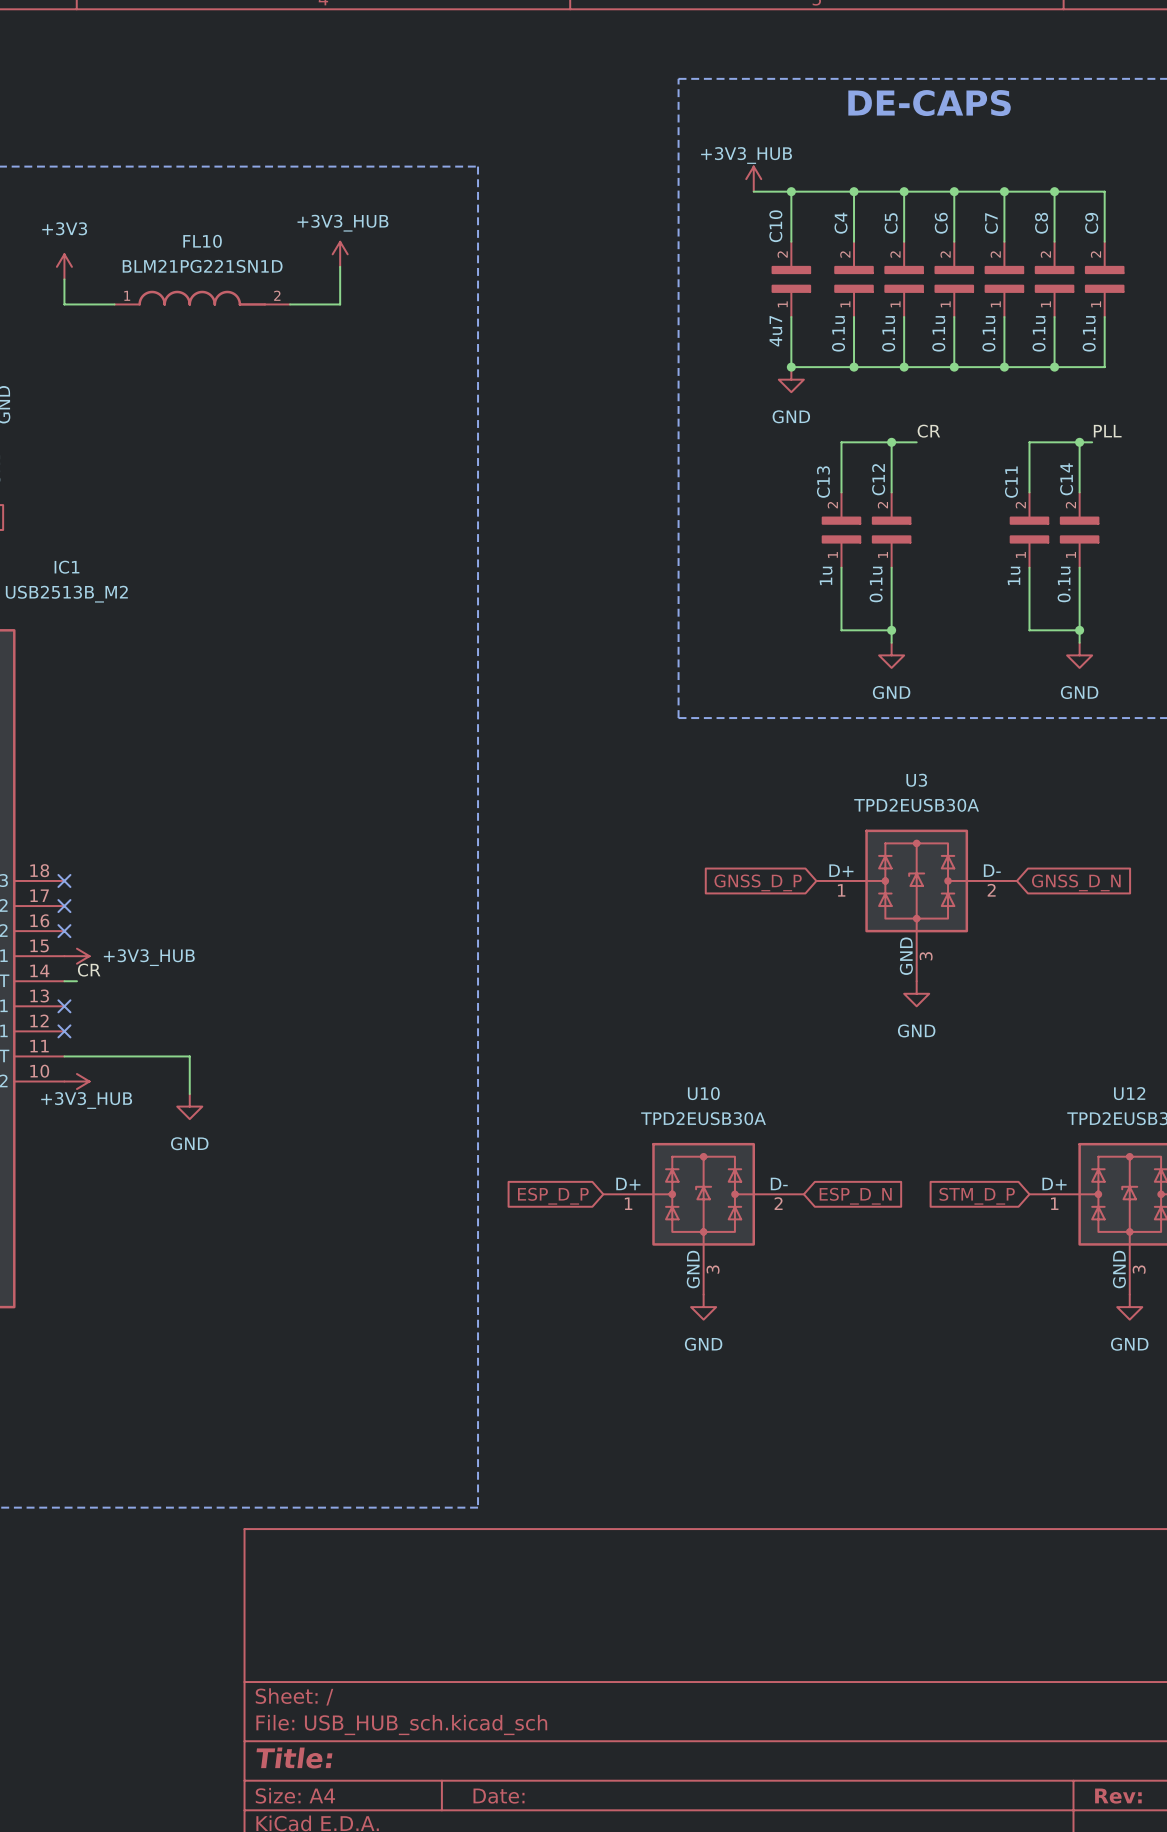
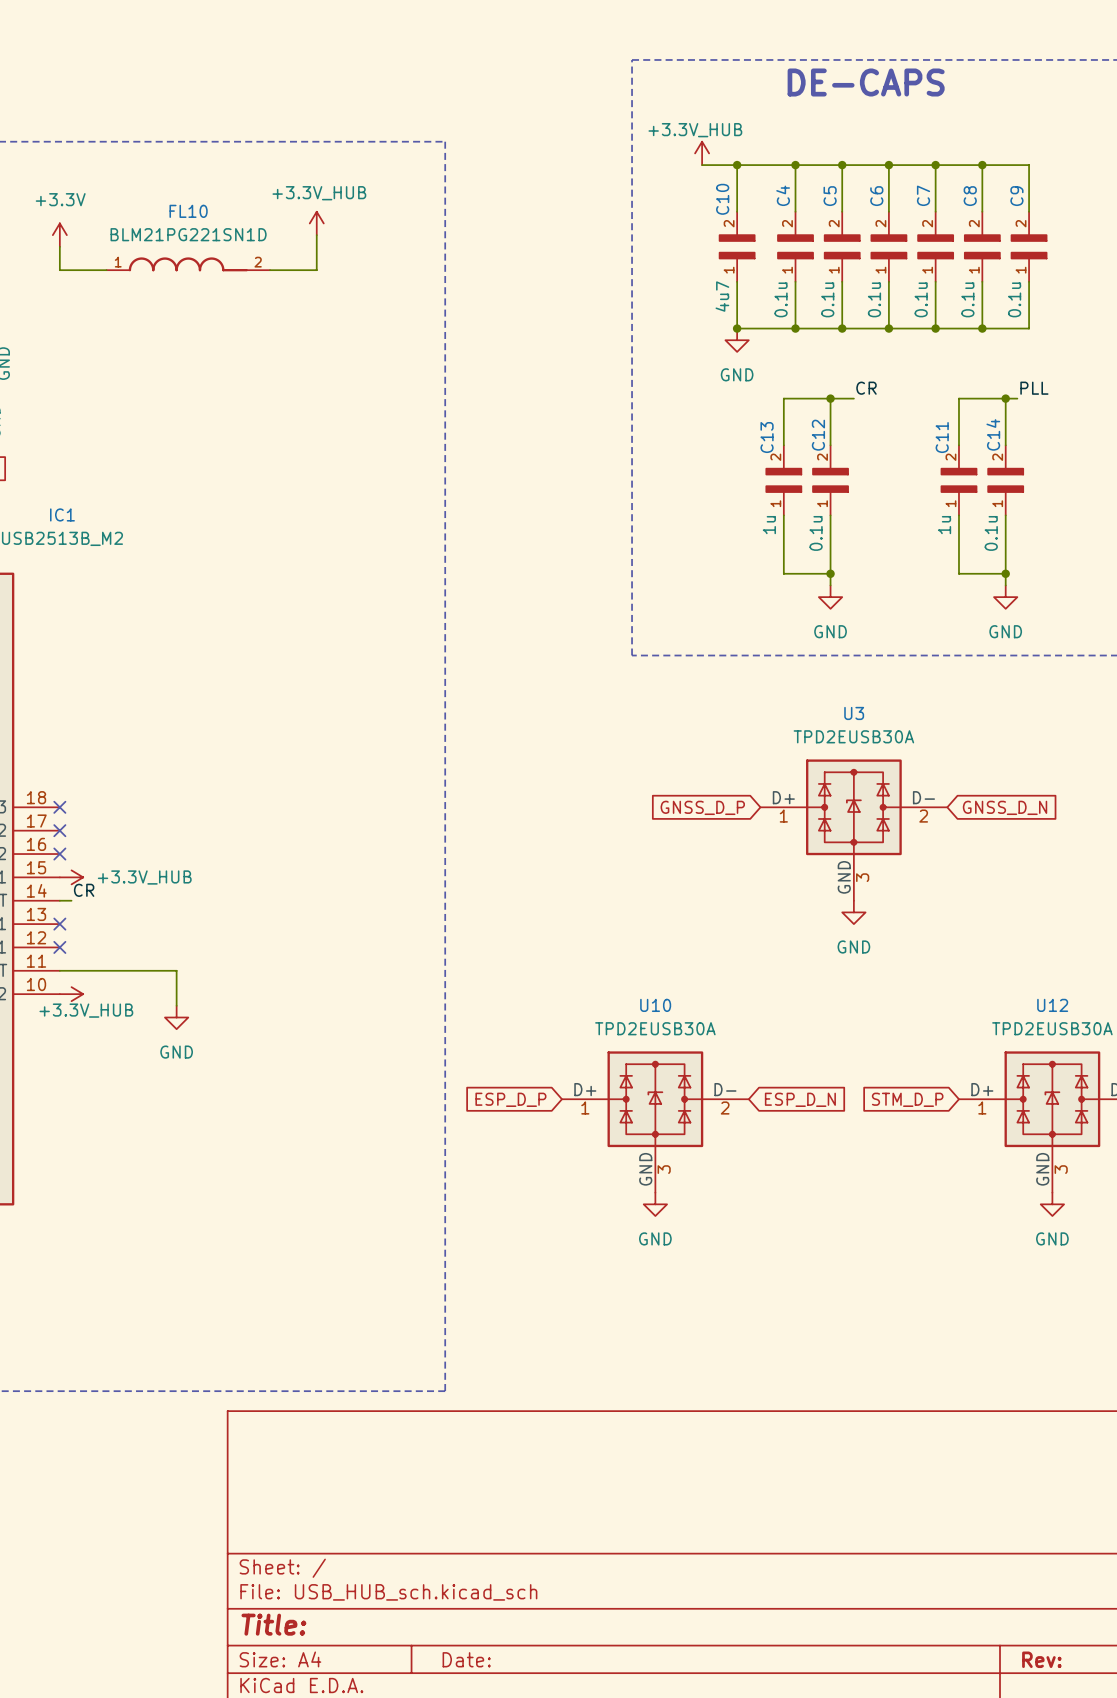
power symbol: +3V3_HUB (753, 179) -> +3.3V_HUB (702, 153)
power symbol: +3V3_HUB (340, 254) -> +3.3V_HUB (316, 223)
power symbol: +3V3 (64, 266) -> +3.3V (59, 235)
power symbol: +3V3_HUB (76, 956) -> +3.3V_HUB (71, 877)
power symbol: +3V3_HUB (76, 1081) -> +3.3V_HUB (71, 994)

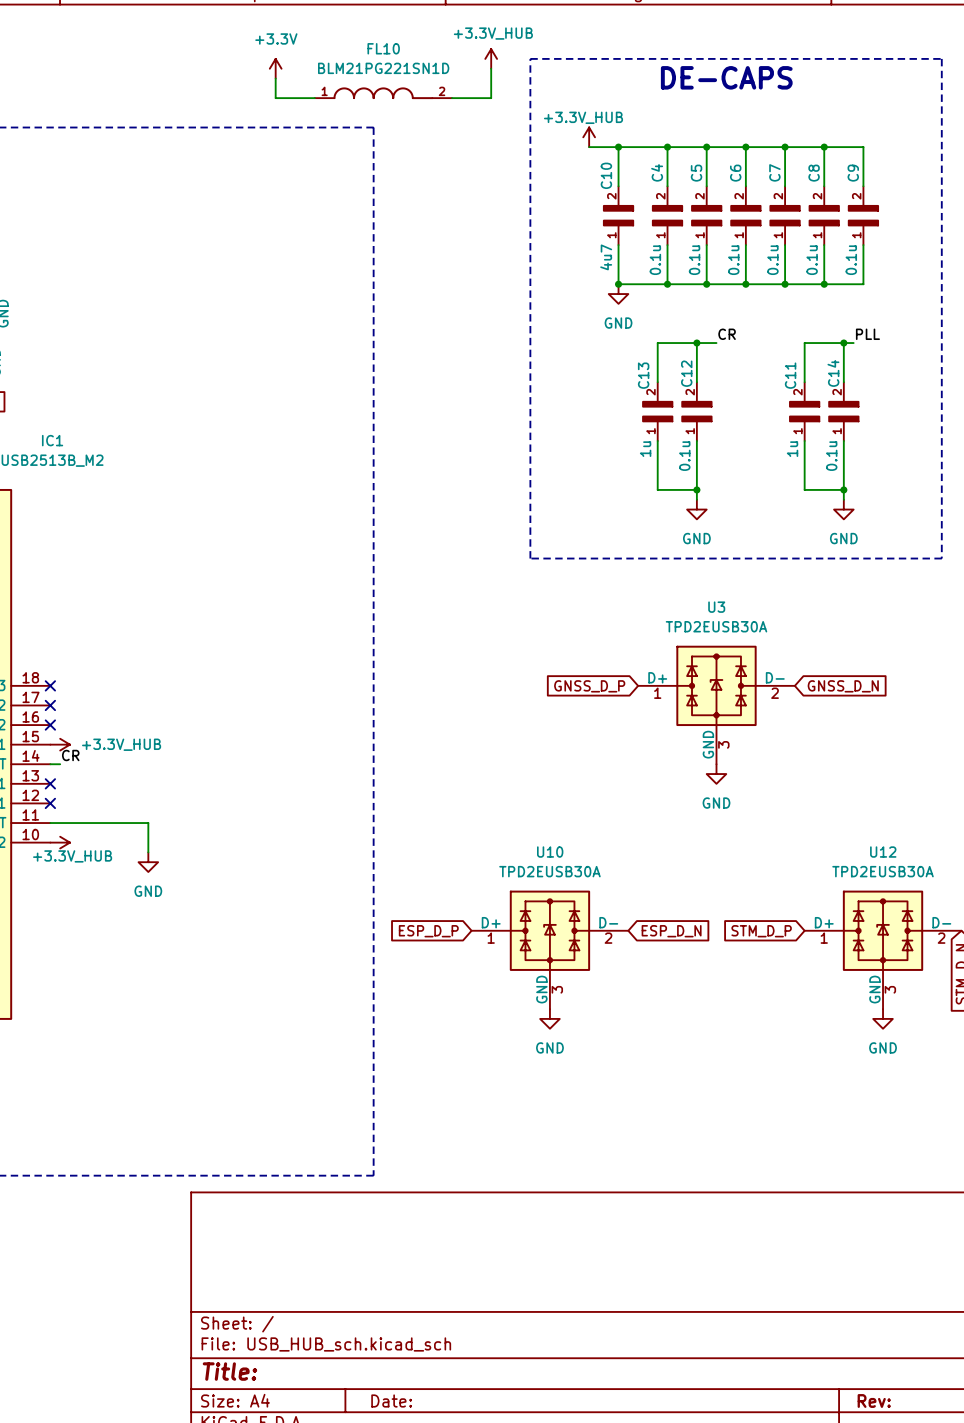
power symbol: none -> +3.3V_HUB (491, 58)
power symbol: none -> +3.3V (275, 68)
wire: none -> (491, 68) (491, 98) (452, 98)
wire: none -> (275, 78) (275, 98) (314, 98)
power symbol: +3.3V_HUB (316, 223) -> none
power symbol: +3.3V (59, 235) -> none
wire: (316, 235) (316, 270) (270, 270) -> none
wire: (59, 246) (59, 270) (106, 270) -> none
FL10 position: (188, 264) -> (383, 93)

